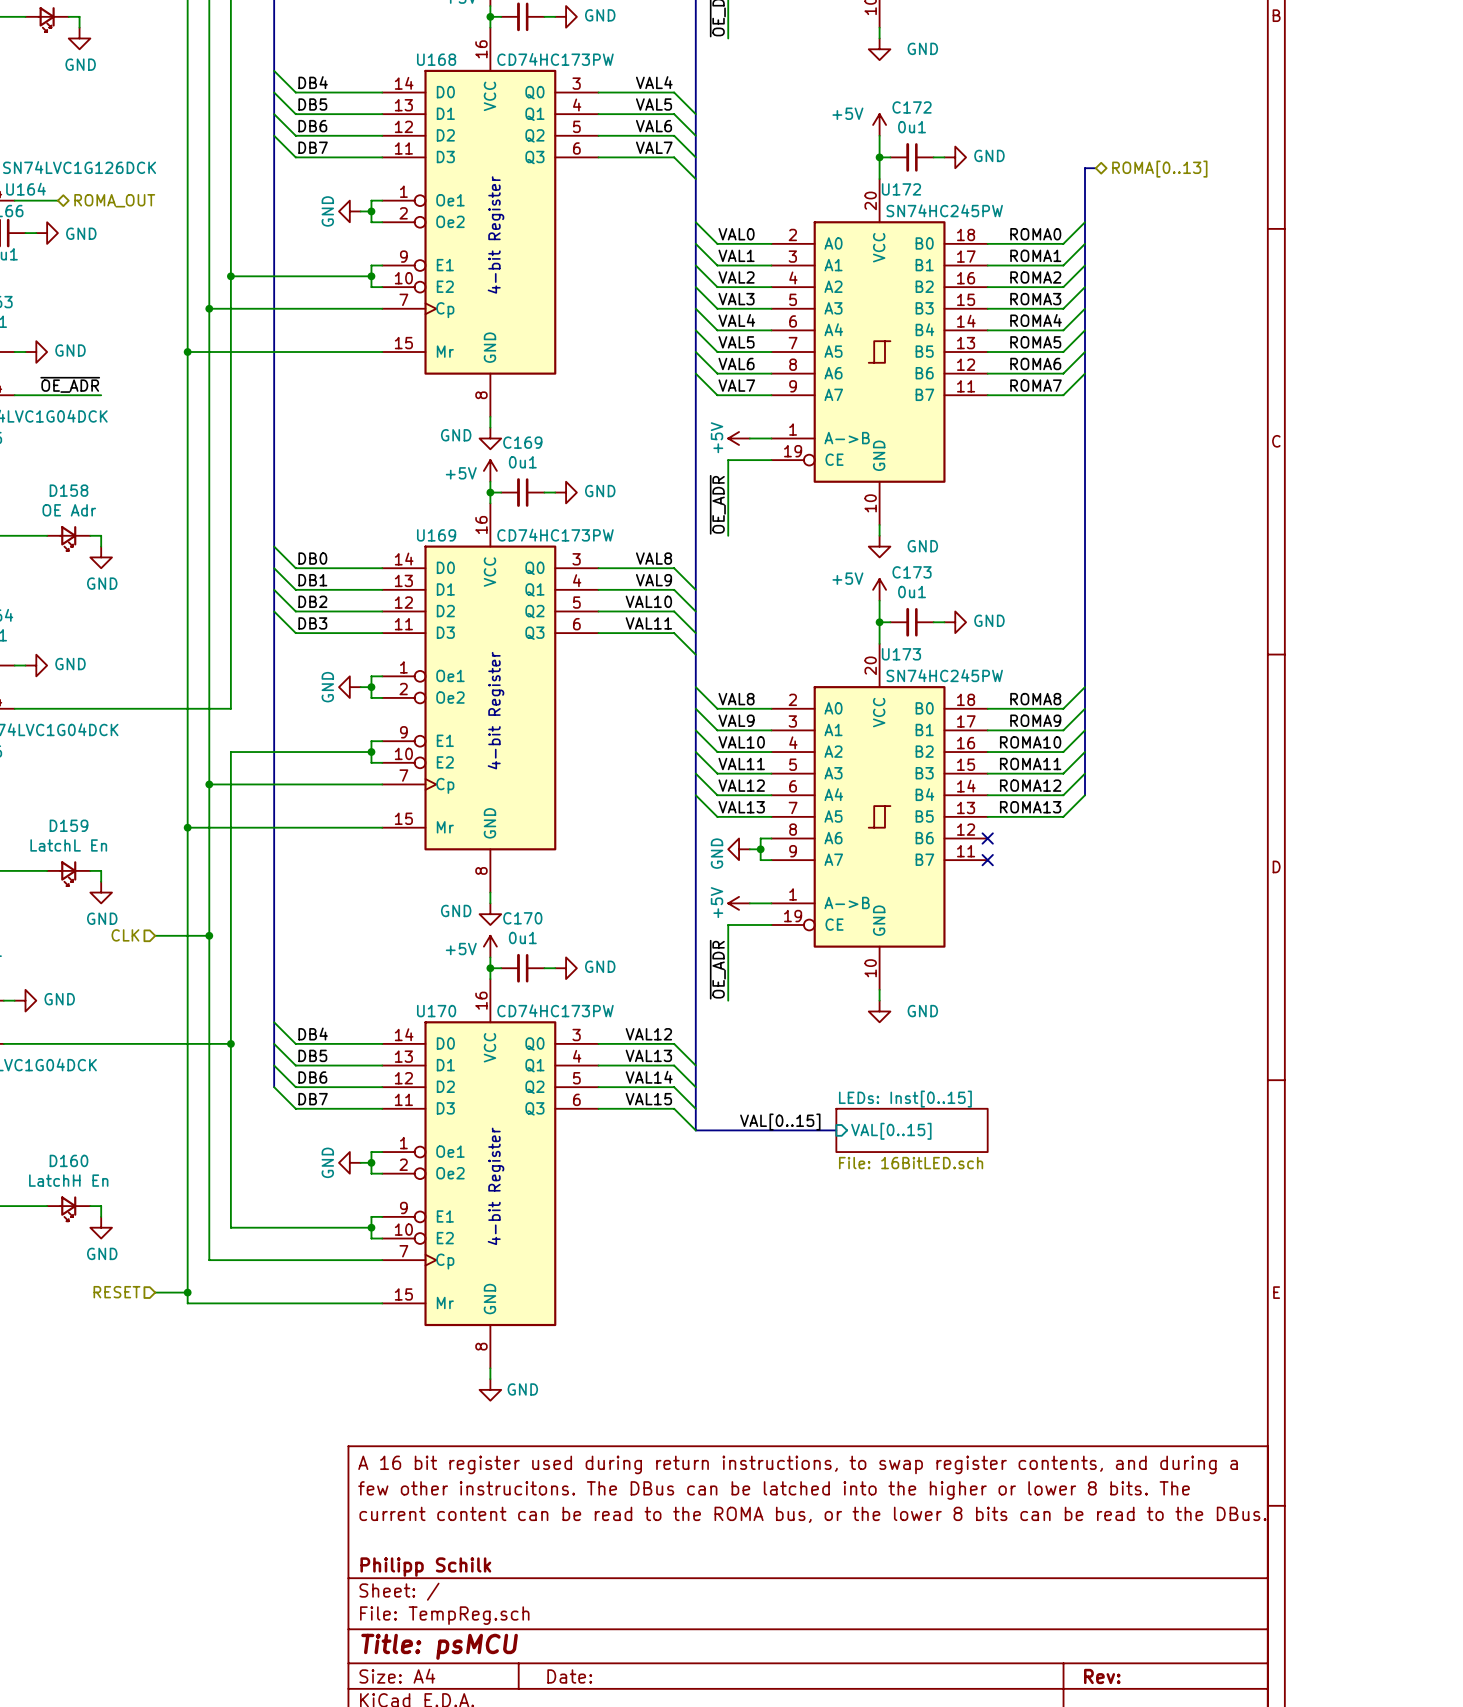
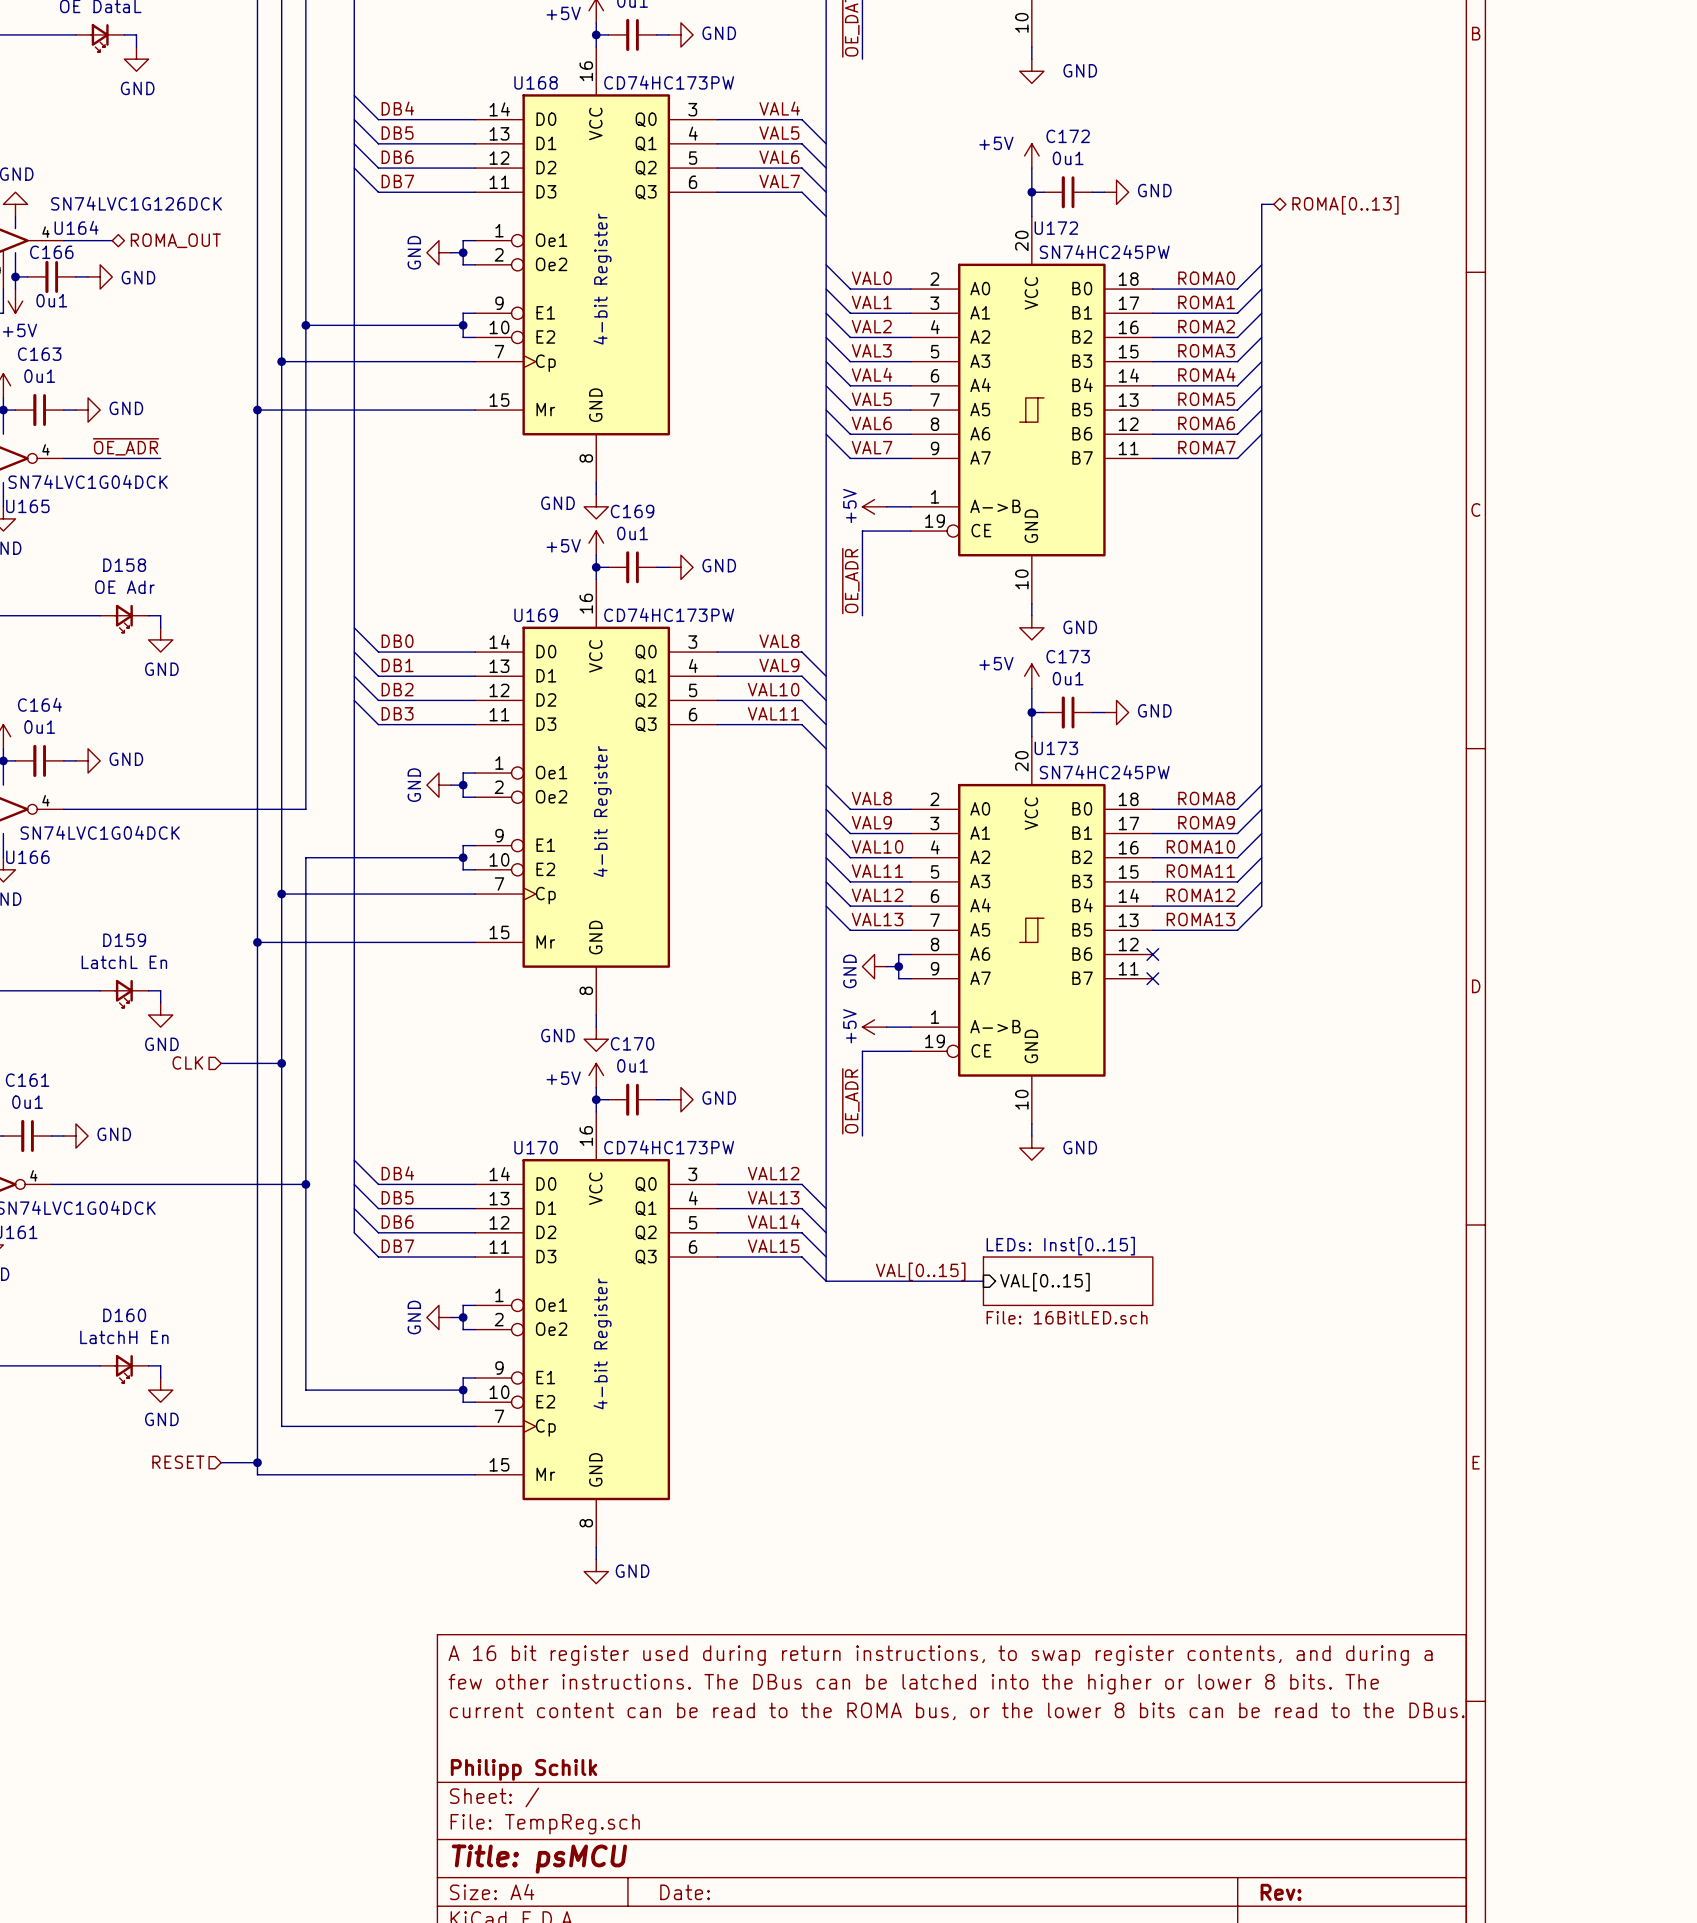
title block: few other instrucitons. The DBus can be latched into the higher or lower 8 bits. The (774, 1490) -> few other instructions. The DBus can be latched into the higher or lower 8 bits. The (913, 1684)

